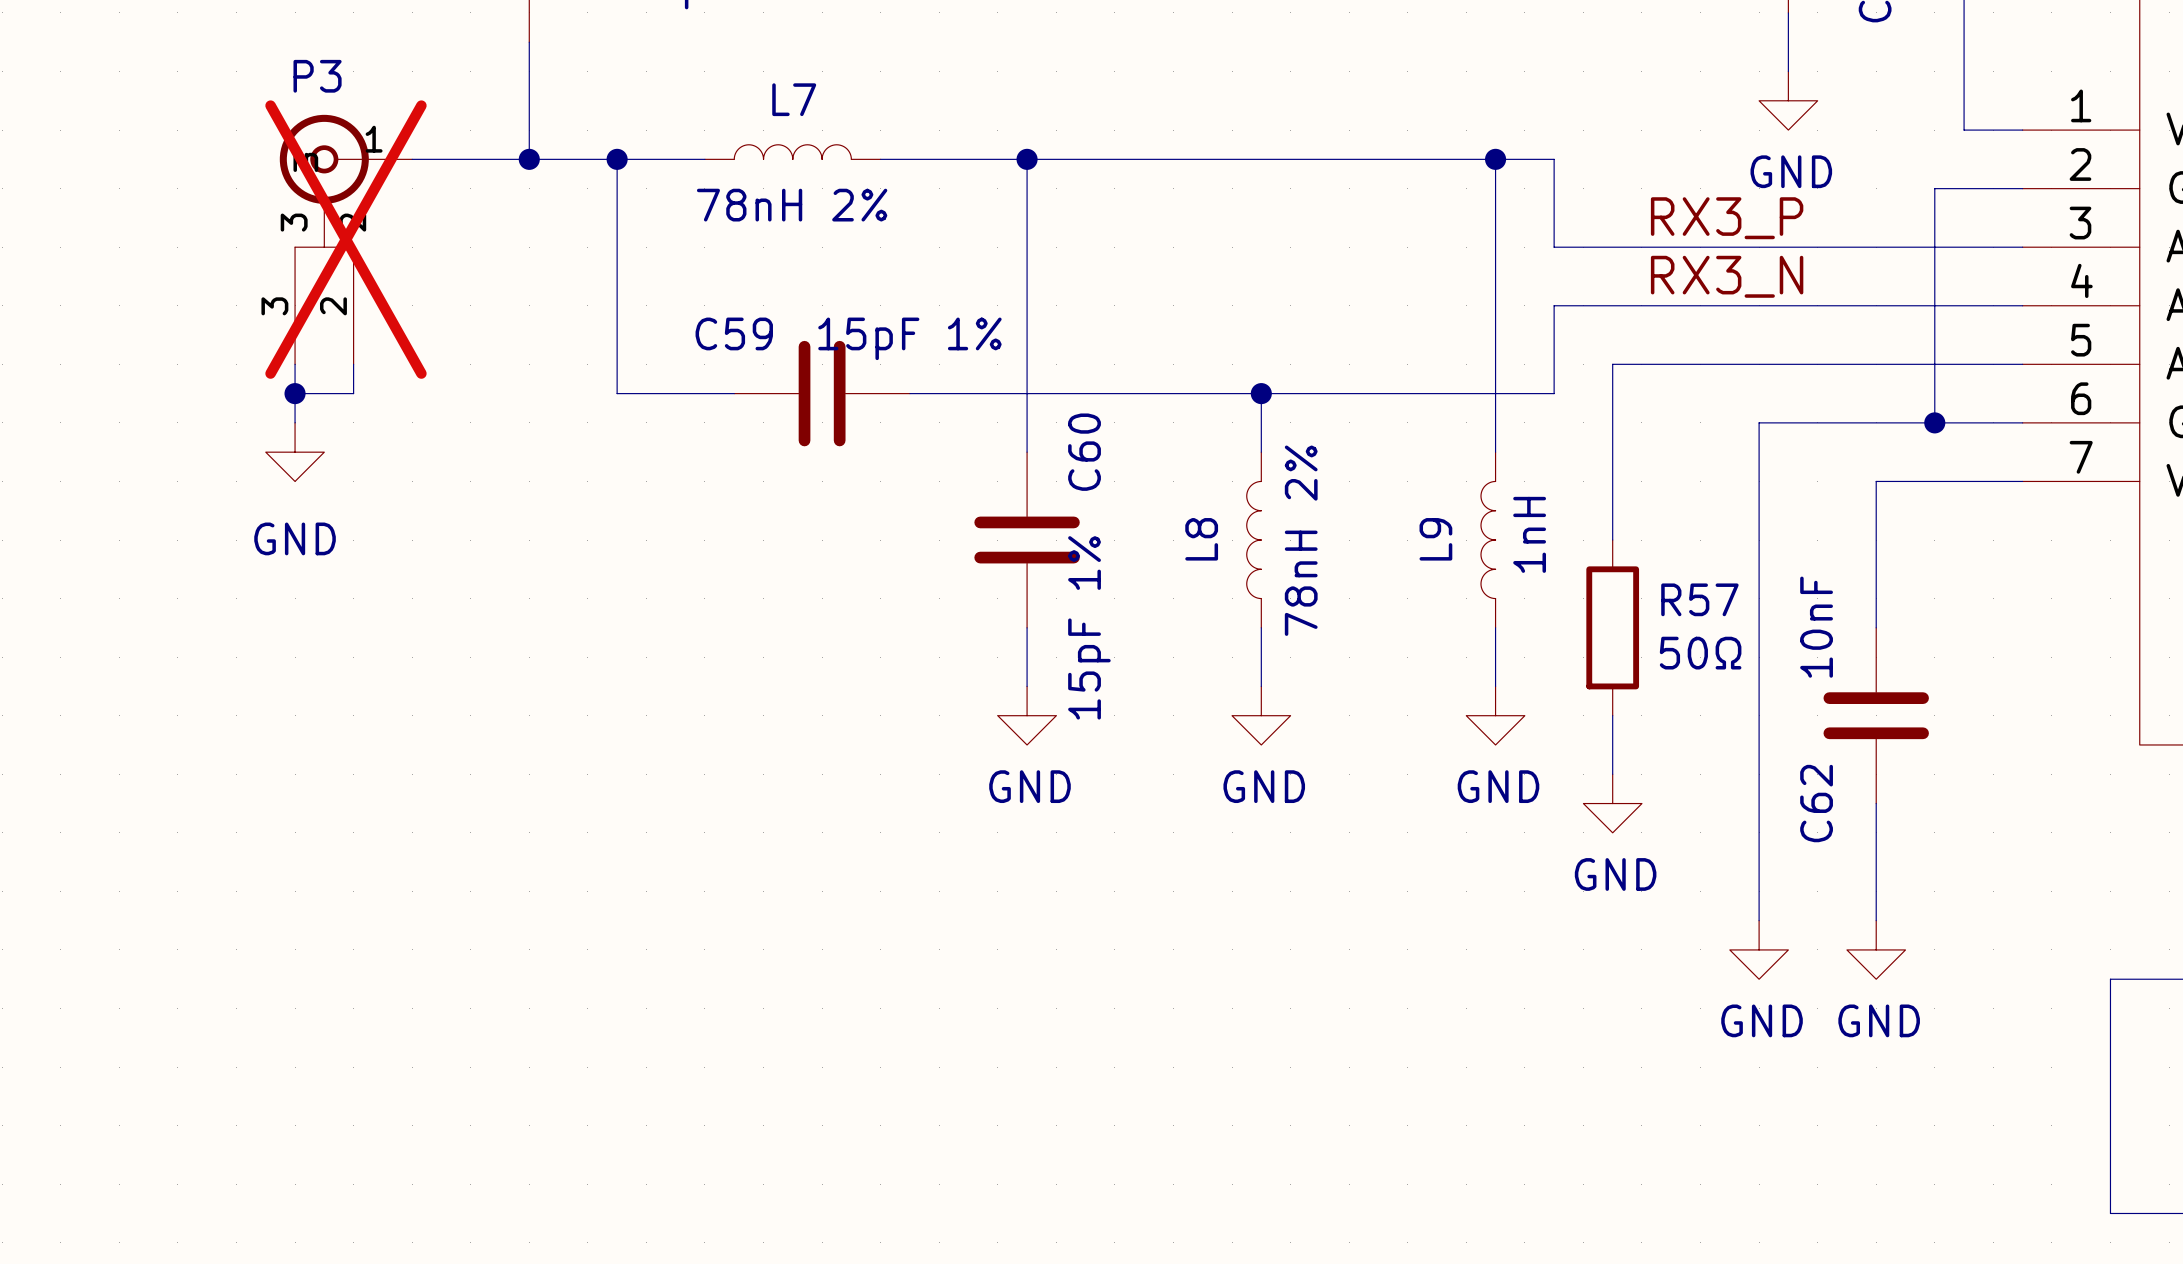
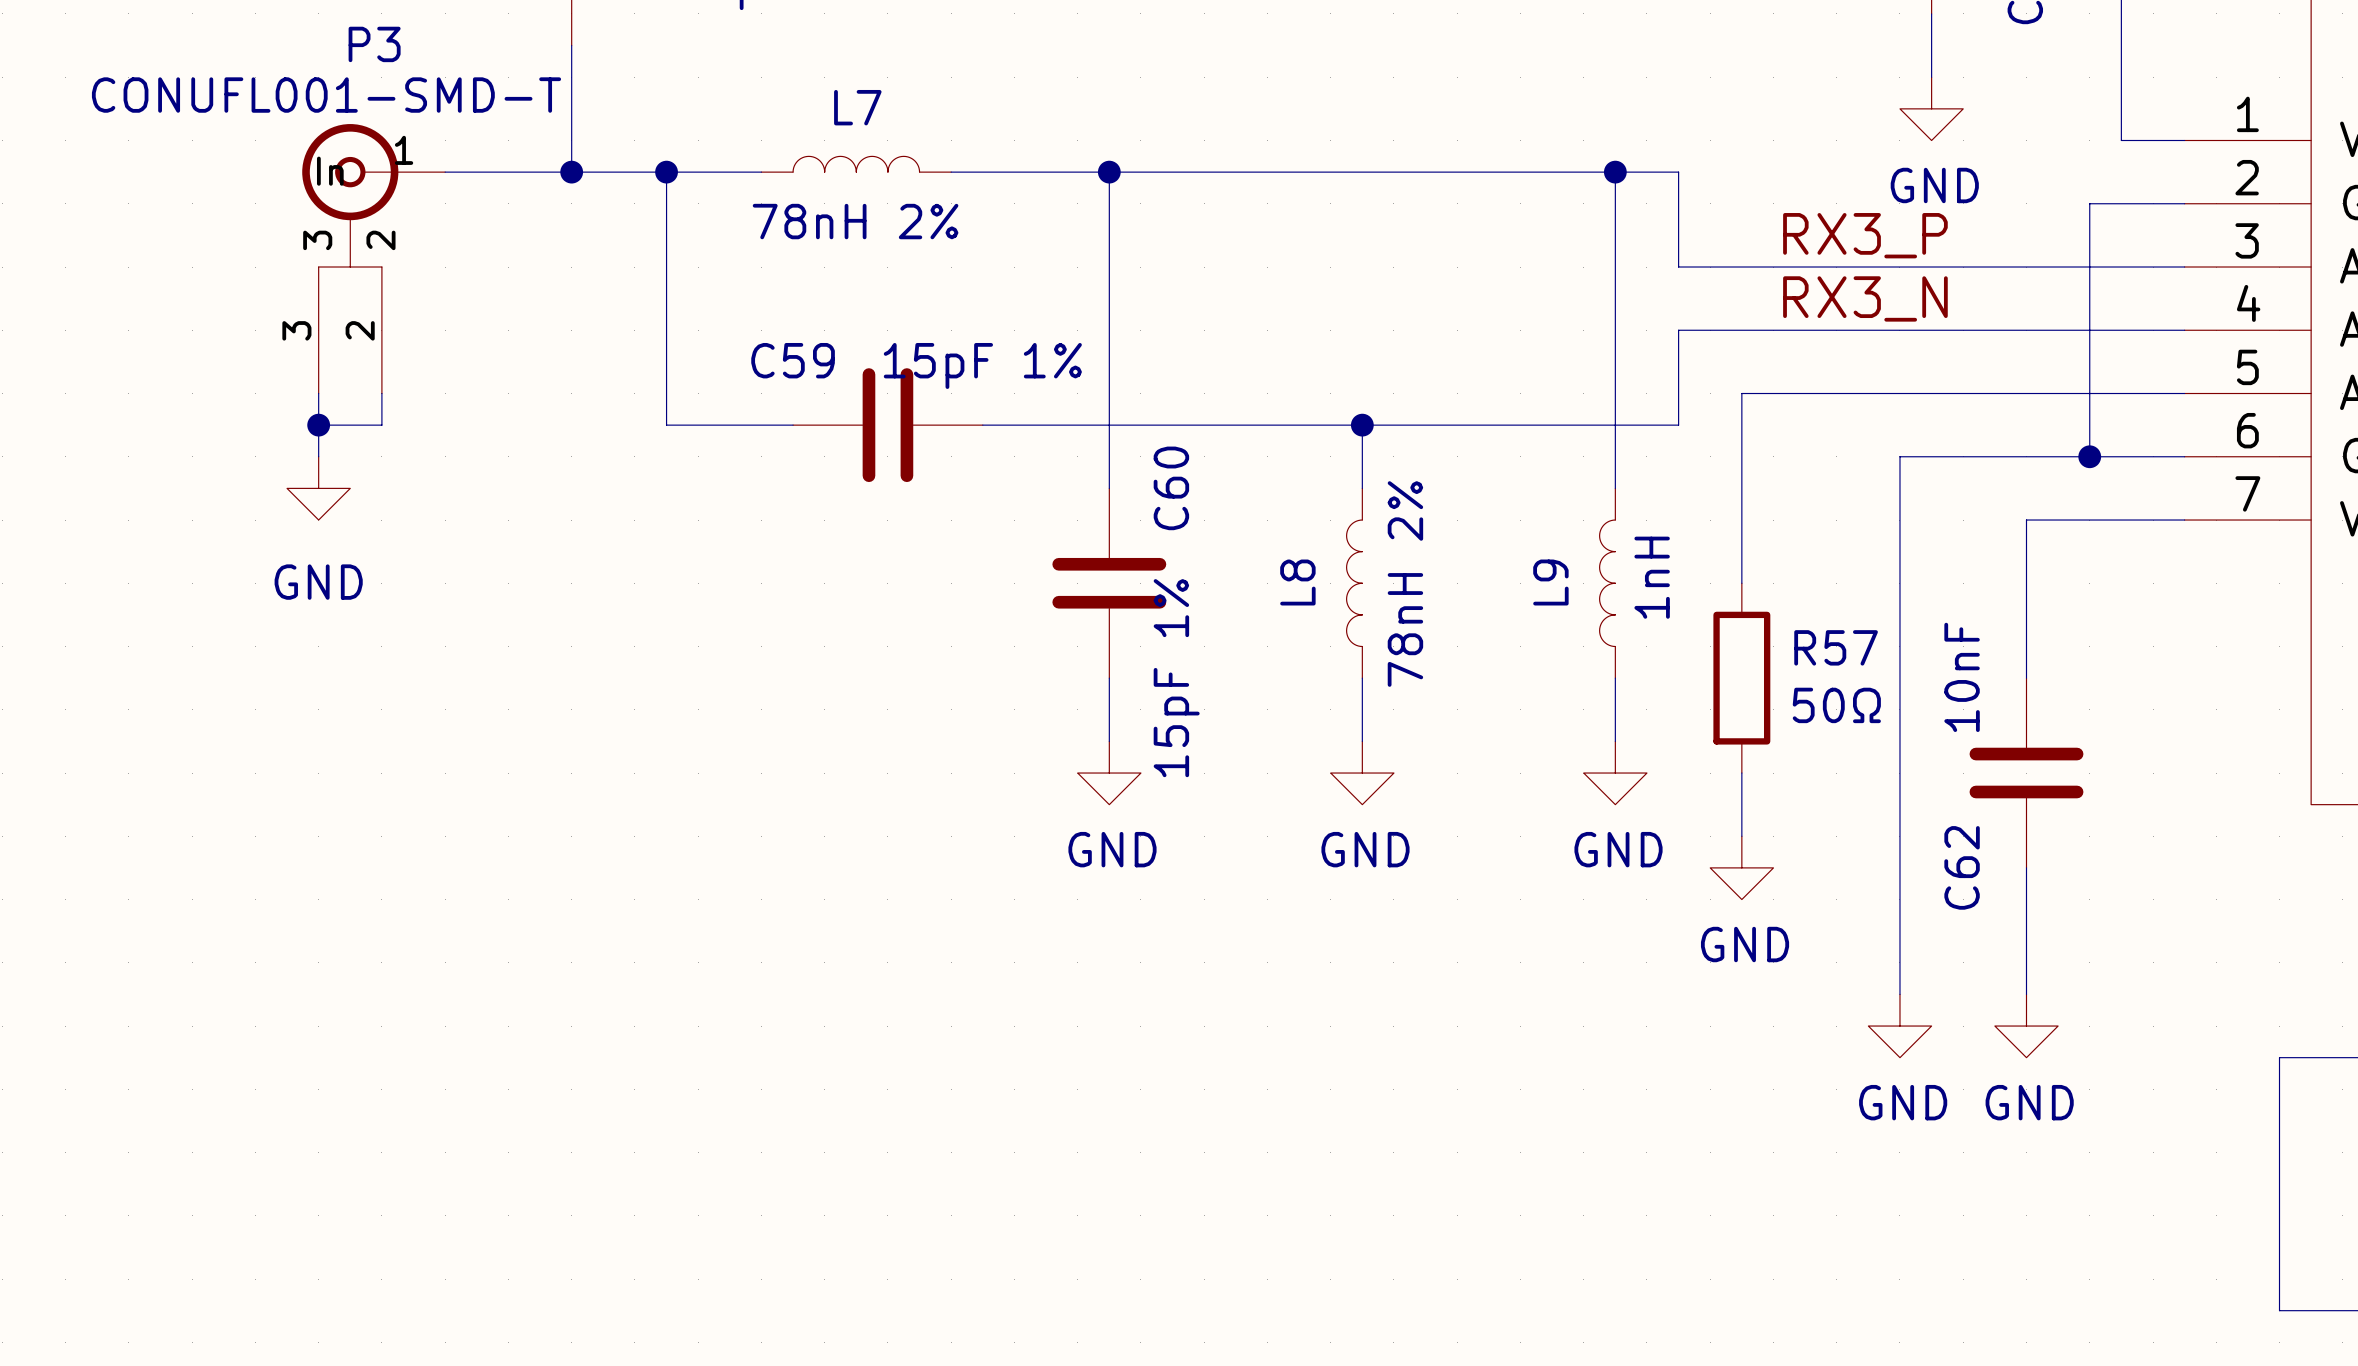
P3 name position: P3 (317, 76) -> P3 (374, 44)
P3 value: none -> CONUFL001-SMD-T (326, 95)
P3 do-not-place cross: (345, 239) -> none

